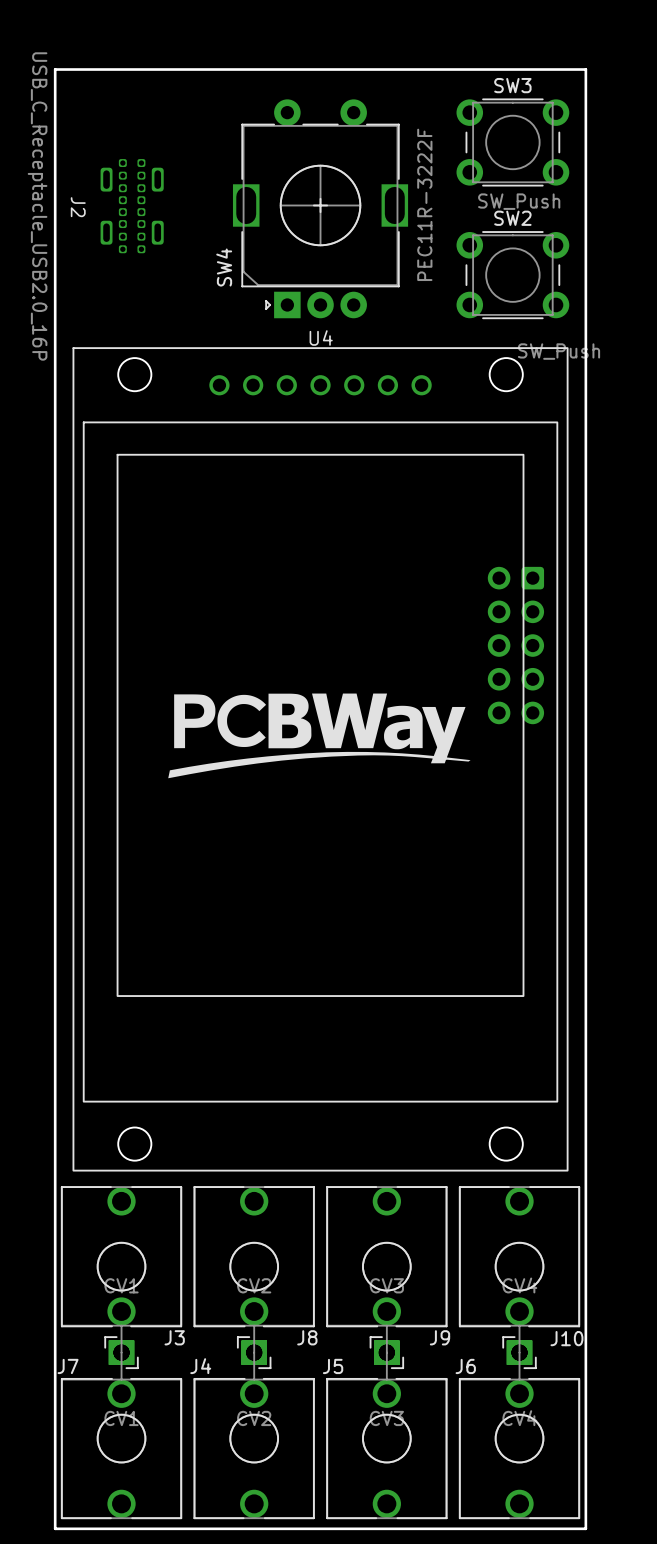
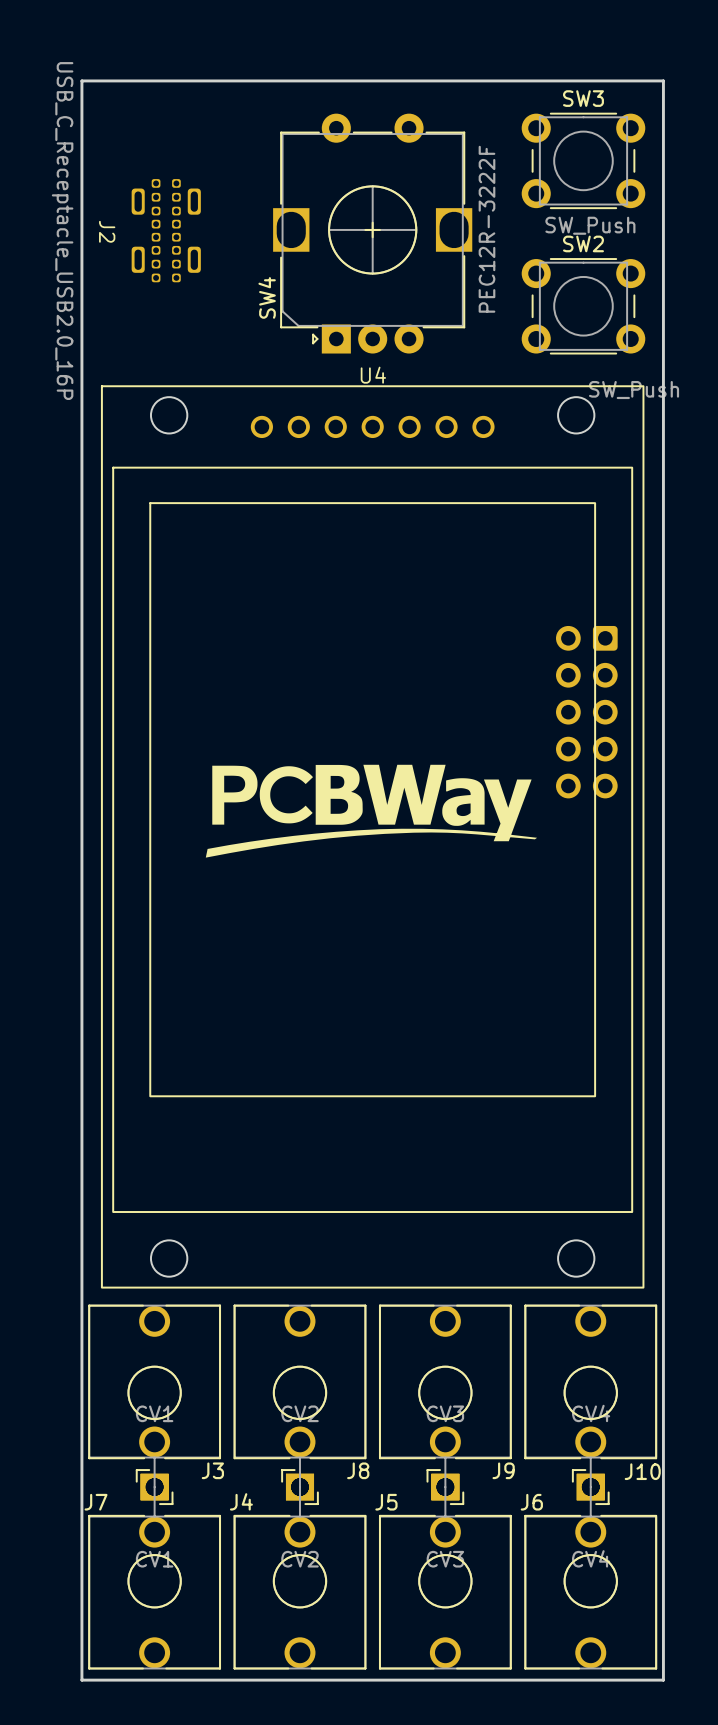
SW4 footprint: [232, 99, 409, 319] -> [273, 113, 473, 354]
SW4 value: PEC11R-3222F (424, 204) -> PEC12R-3222F (486, 229)

